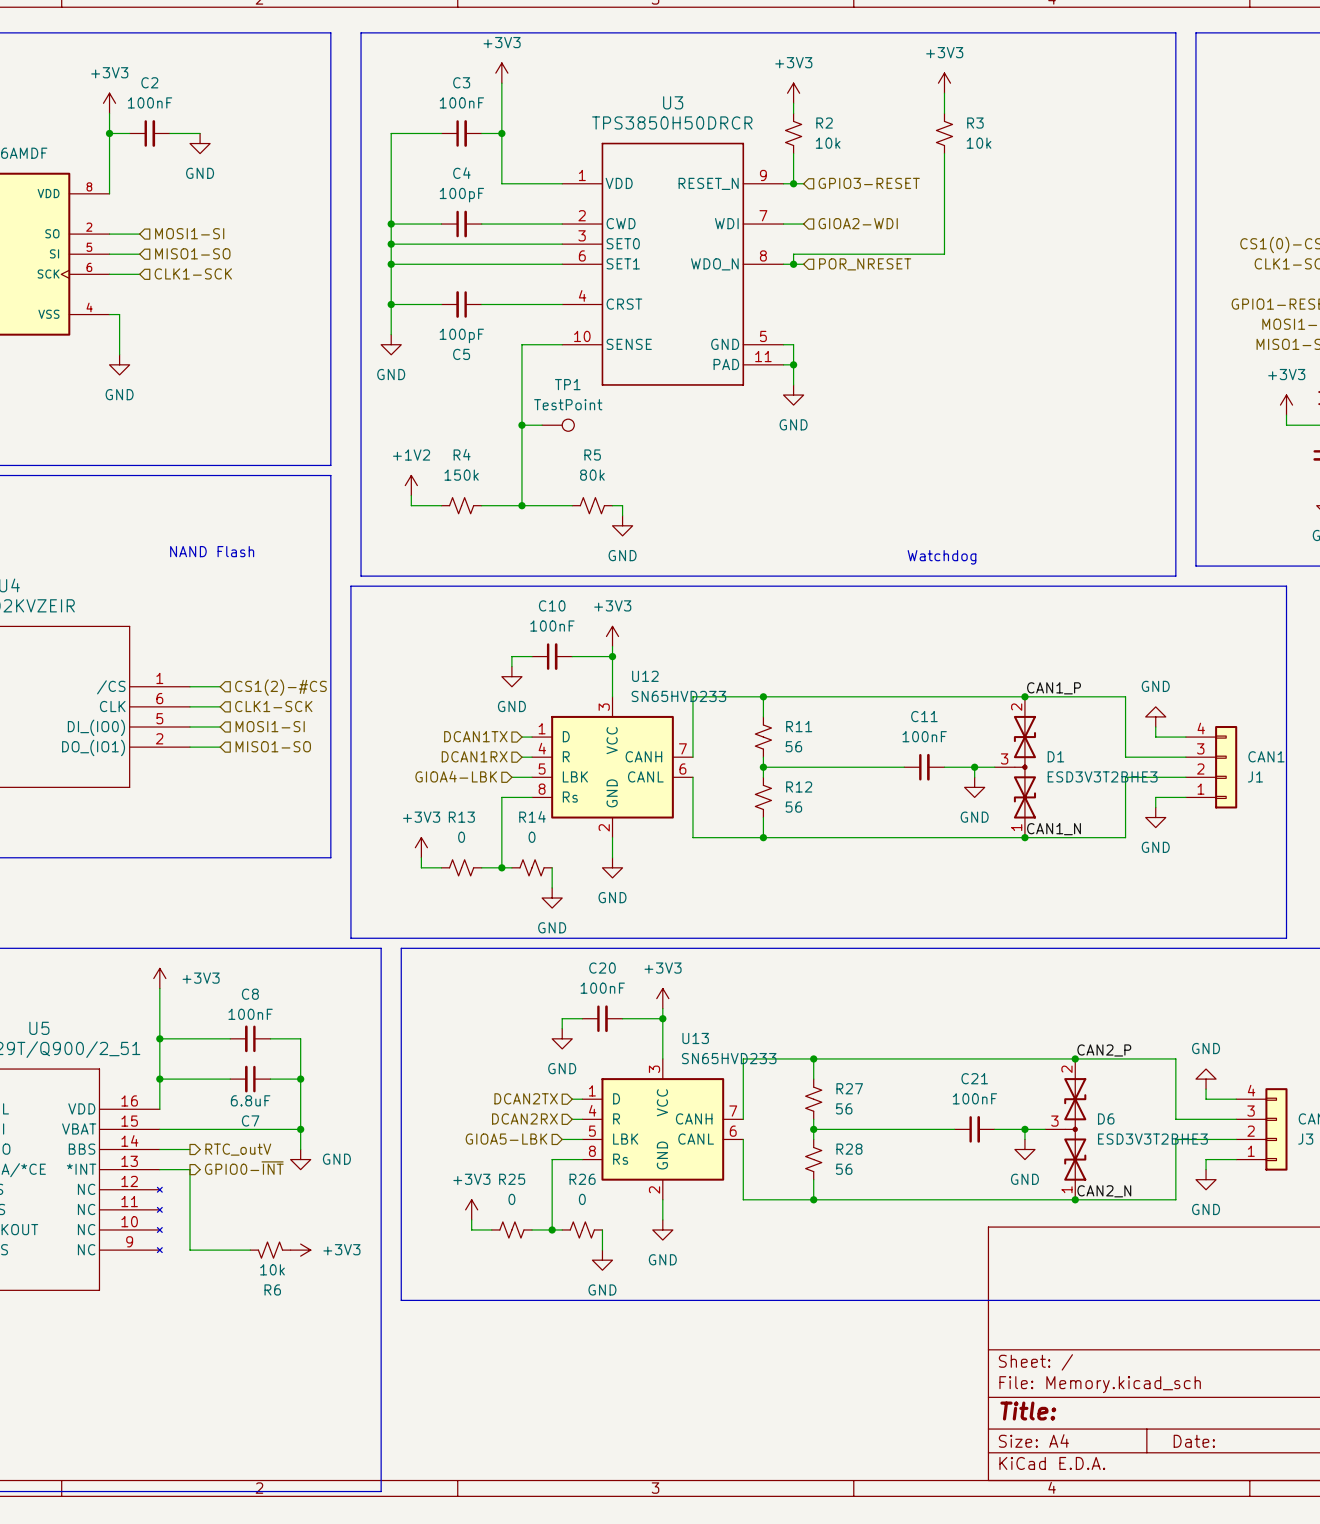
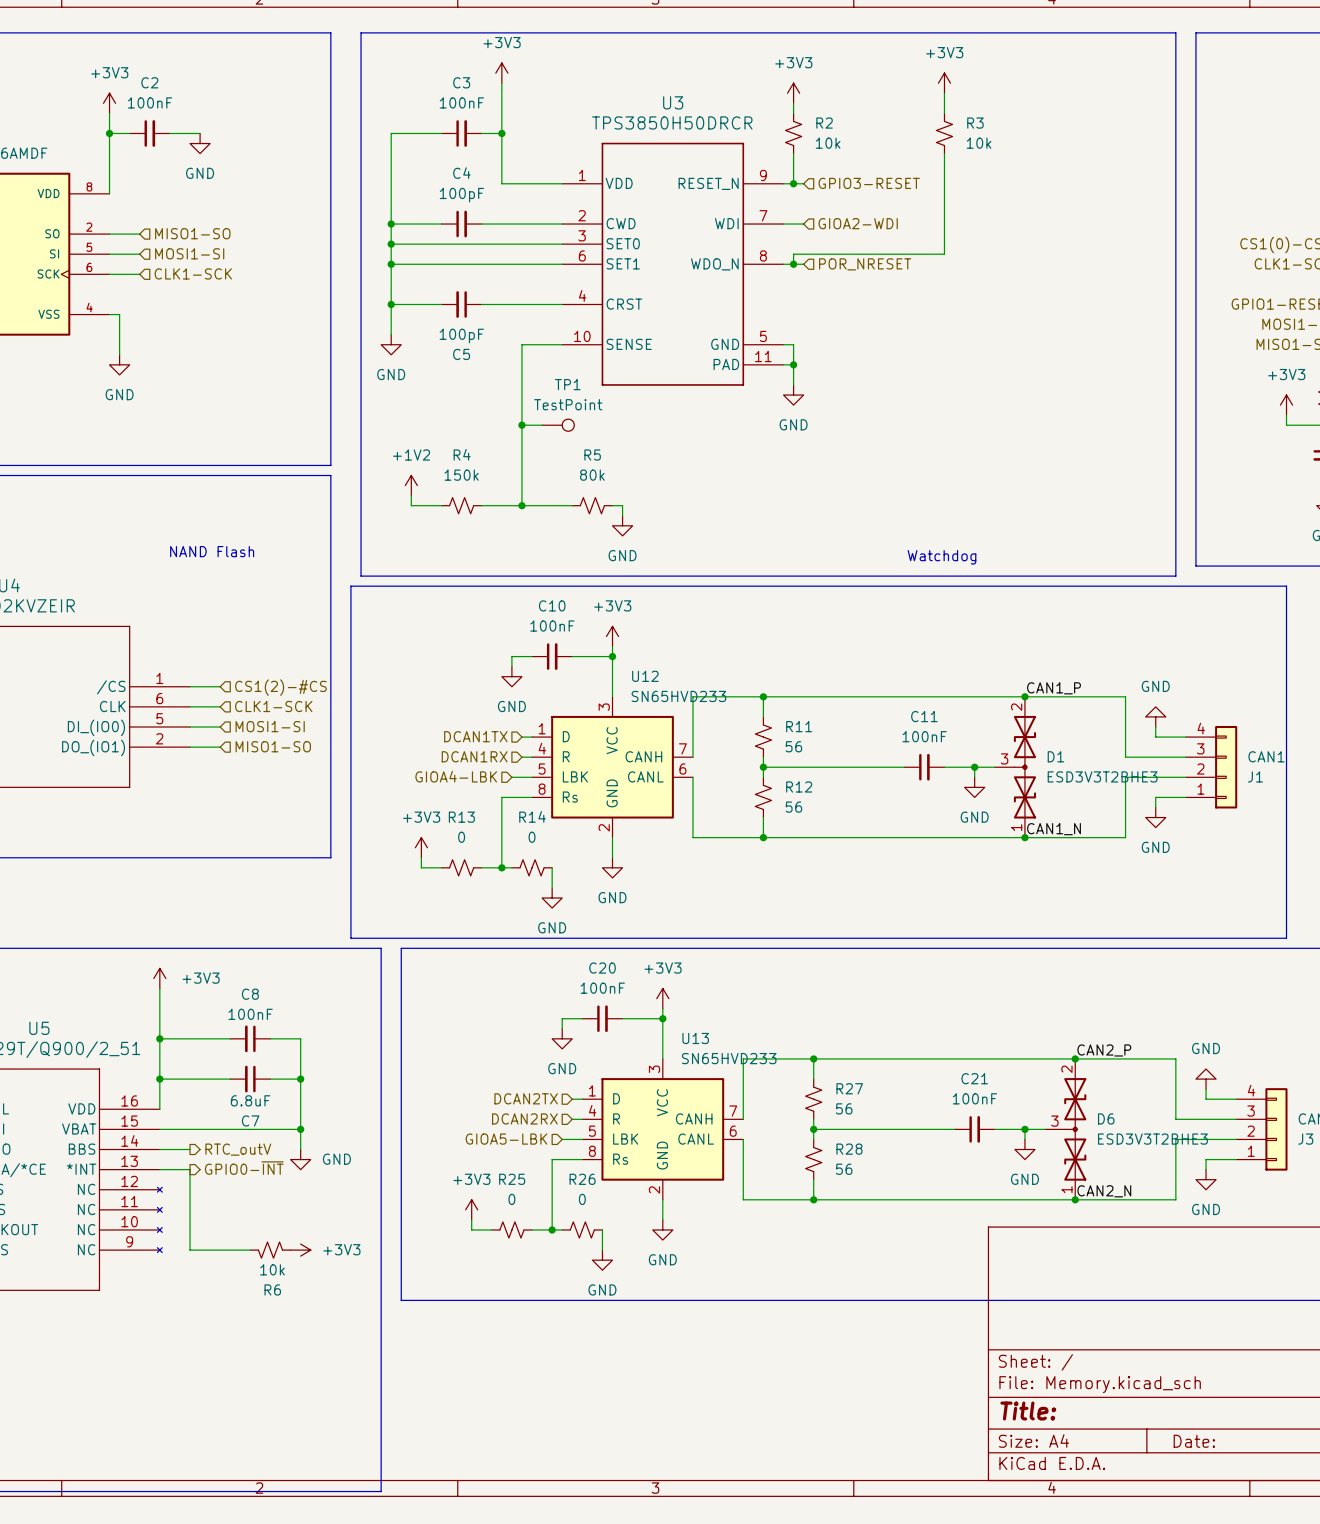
hierarchical label: MOSI1-SI (189, 233) -> MISO1-SO (192, 233)
hierarchical label: MISO1-SO (192, 253) -> MOSI1-SI (189, 253)

